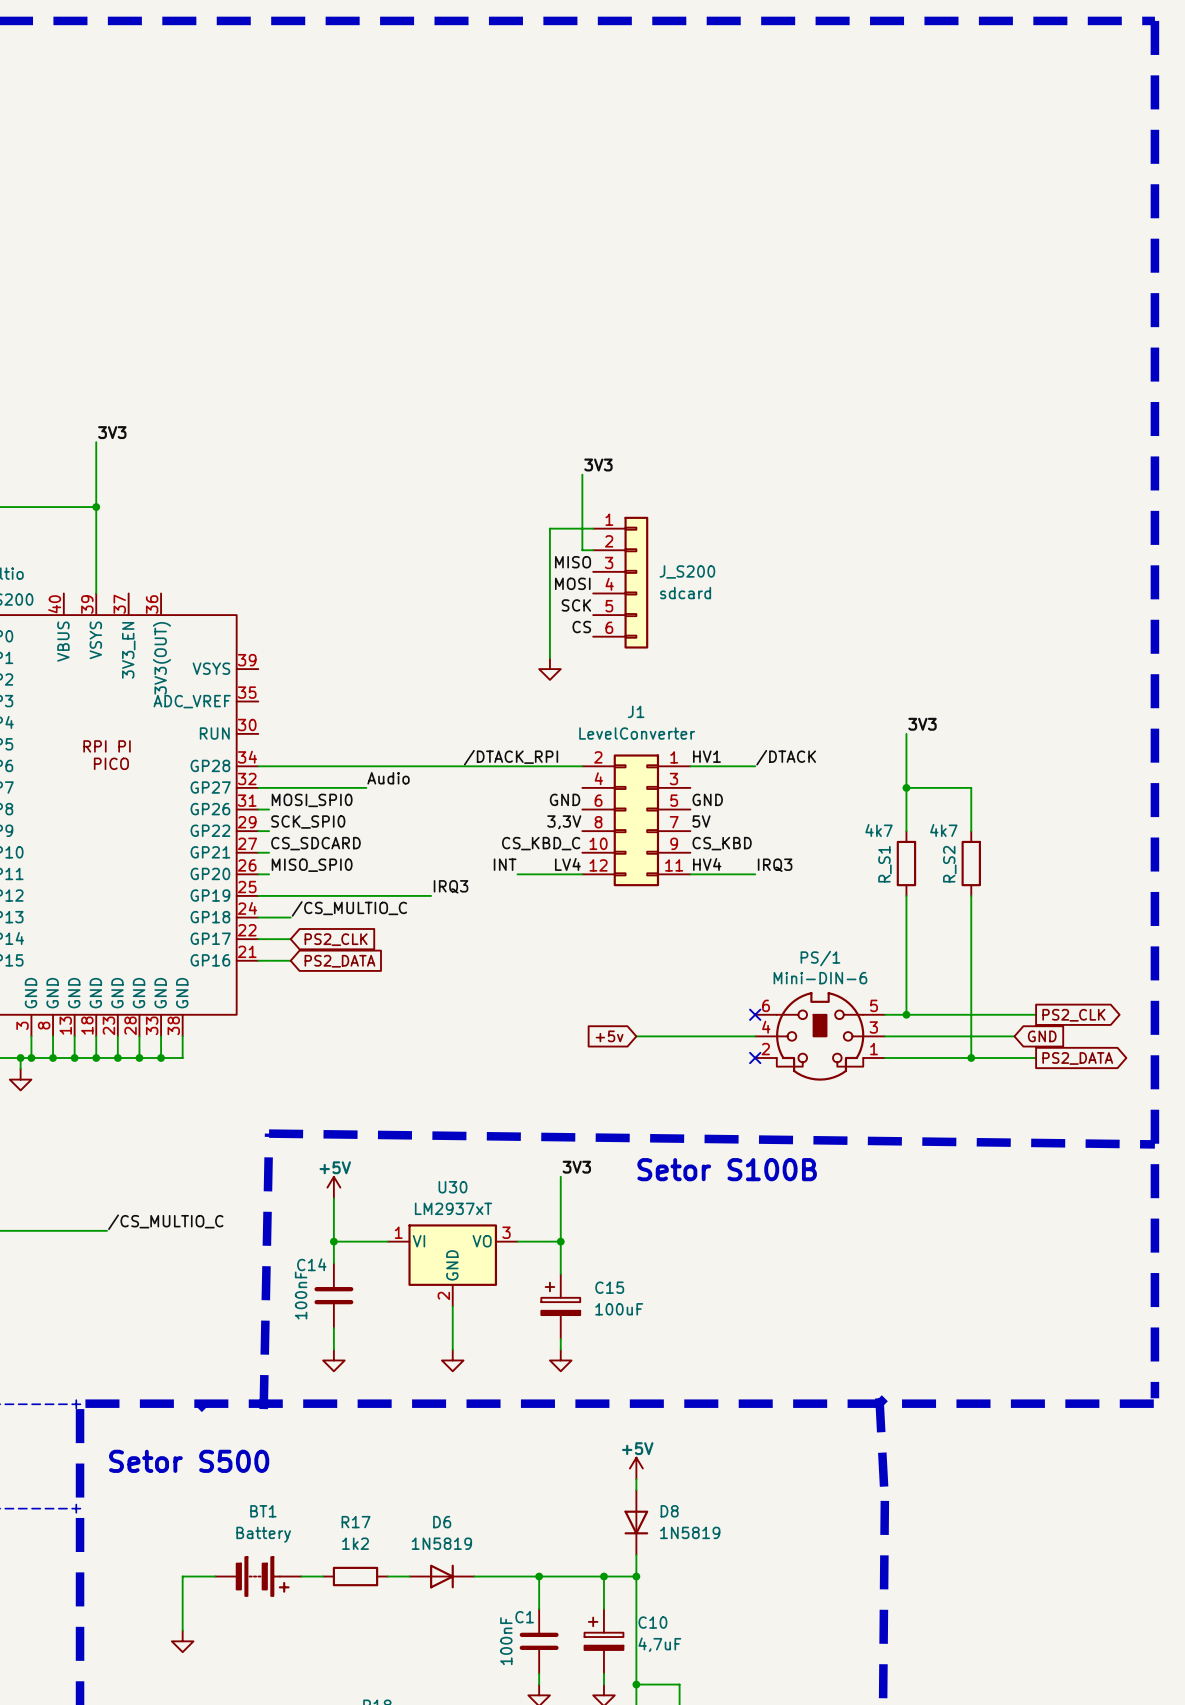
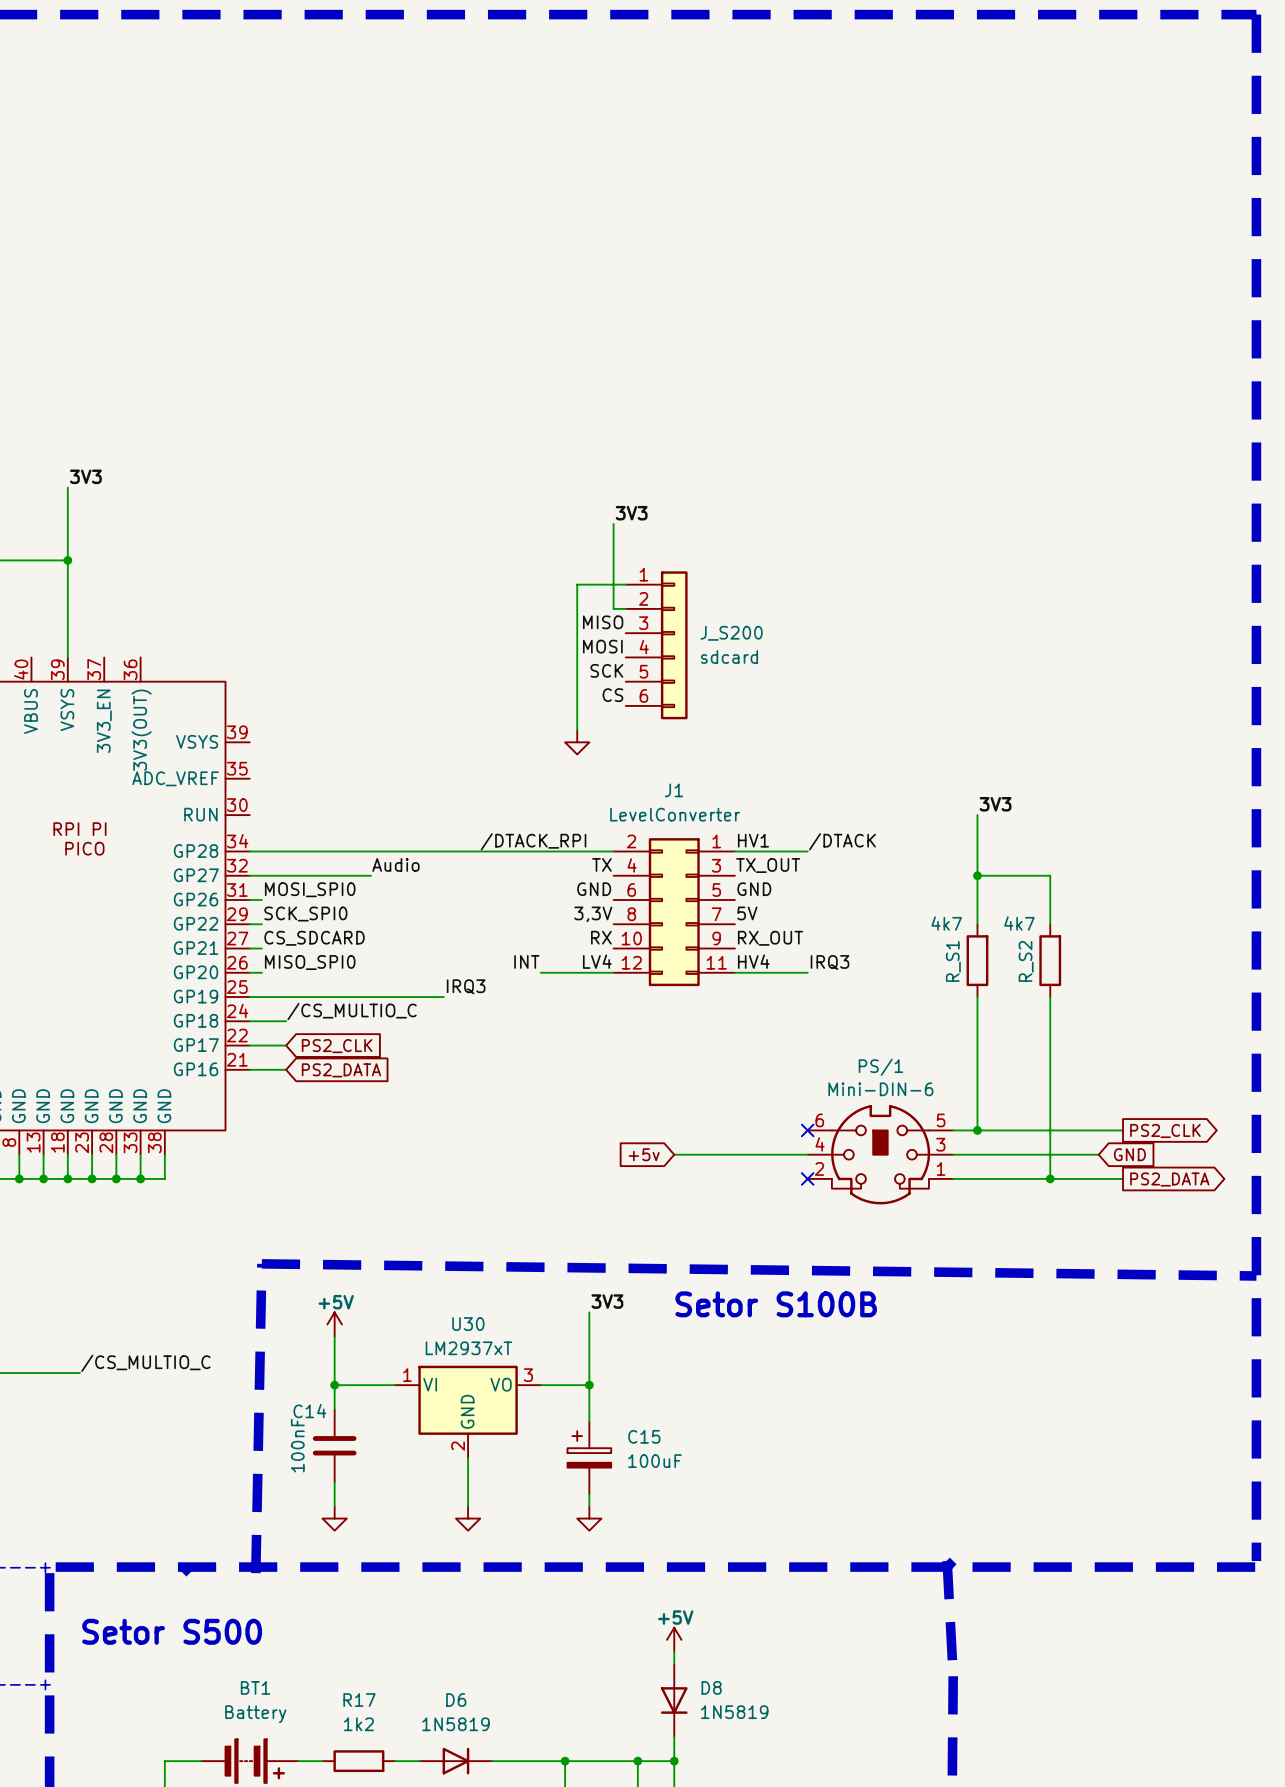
label: none -> TX (601, 864)
label: none -> TX_OUT (768, 865)
label: CS_KBD_C (541, 843) -> RX (601, 937)
label: CS_KBD (722, 843) -> RX_OUT (770, 938)

